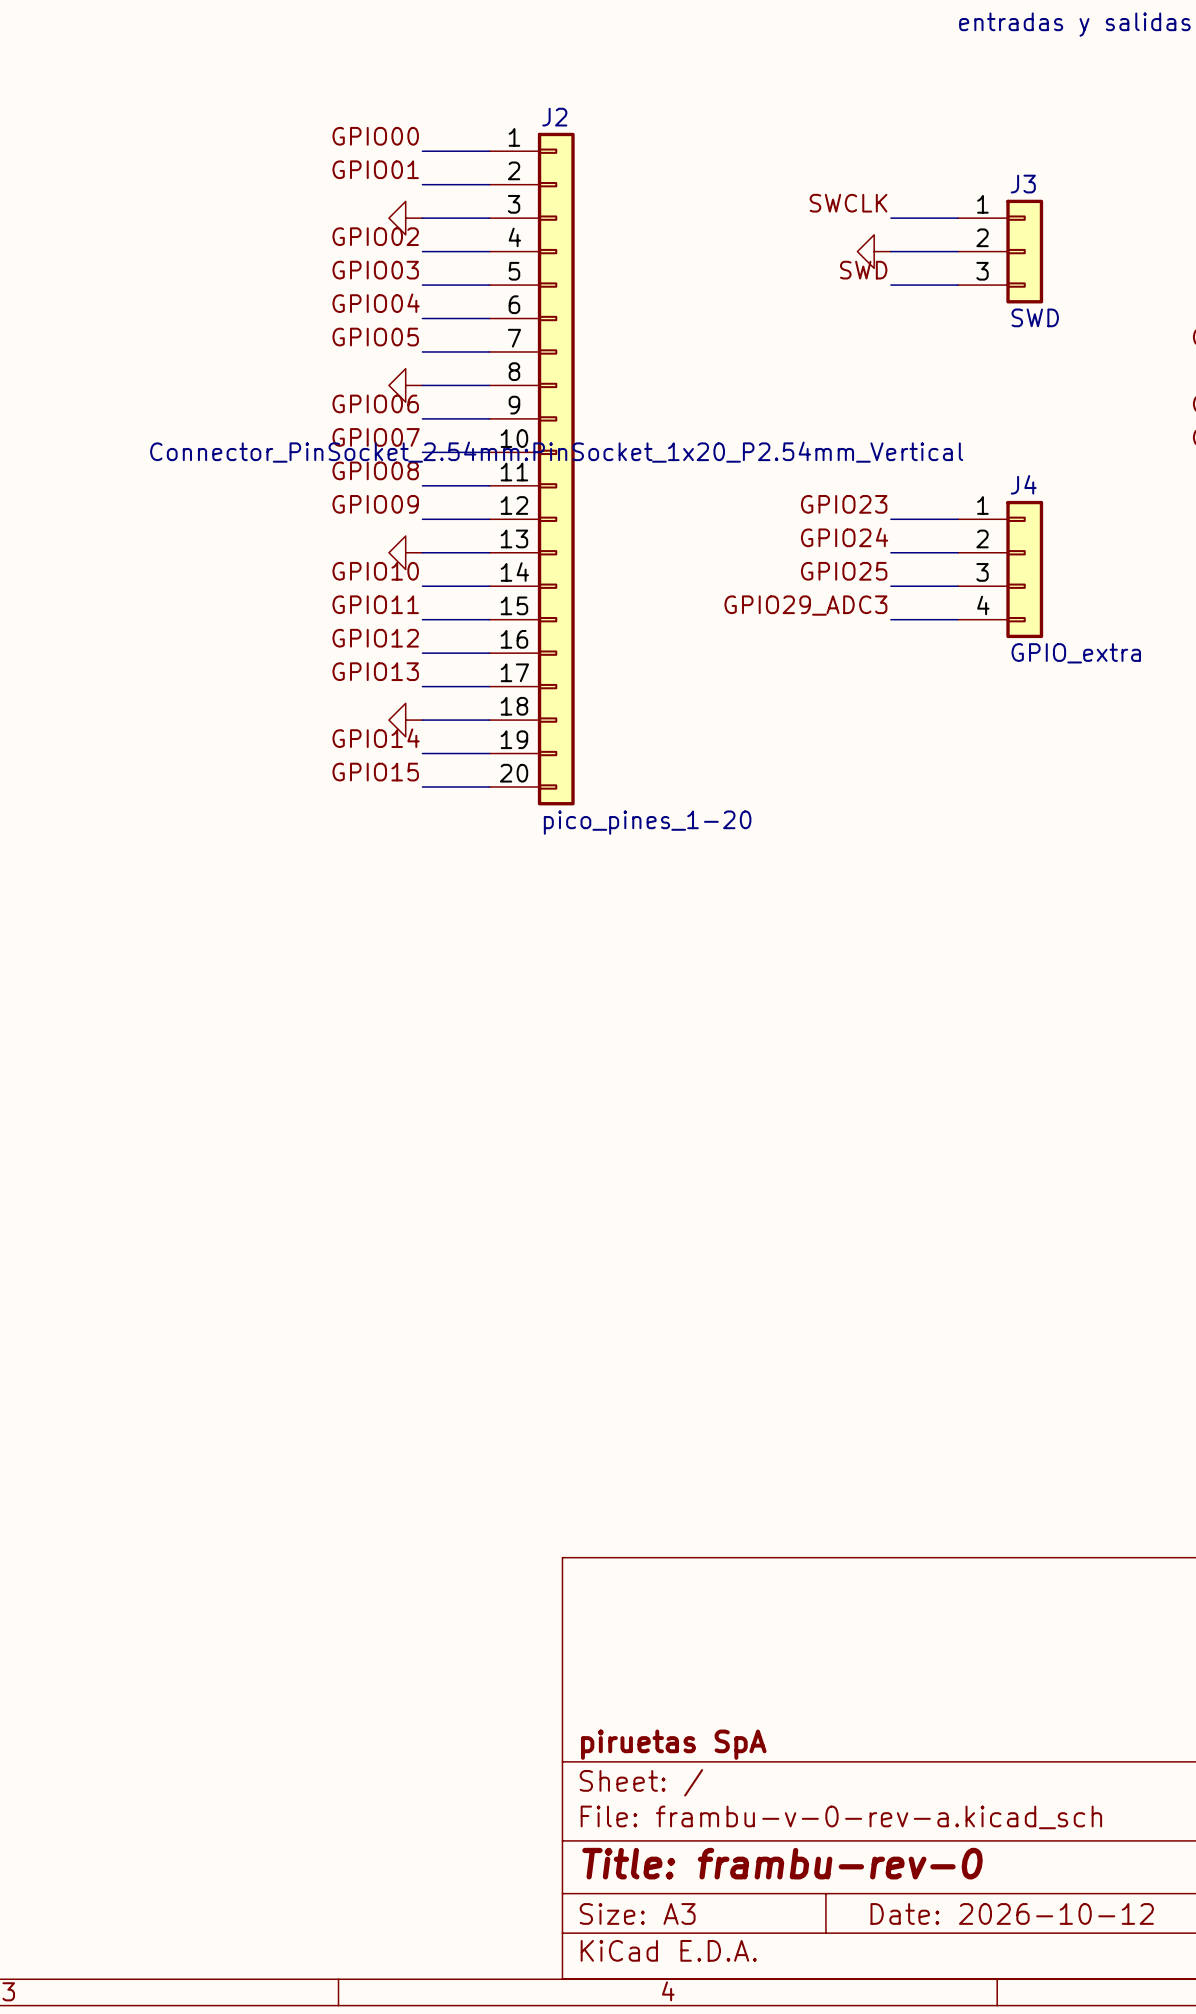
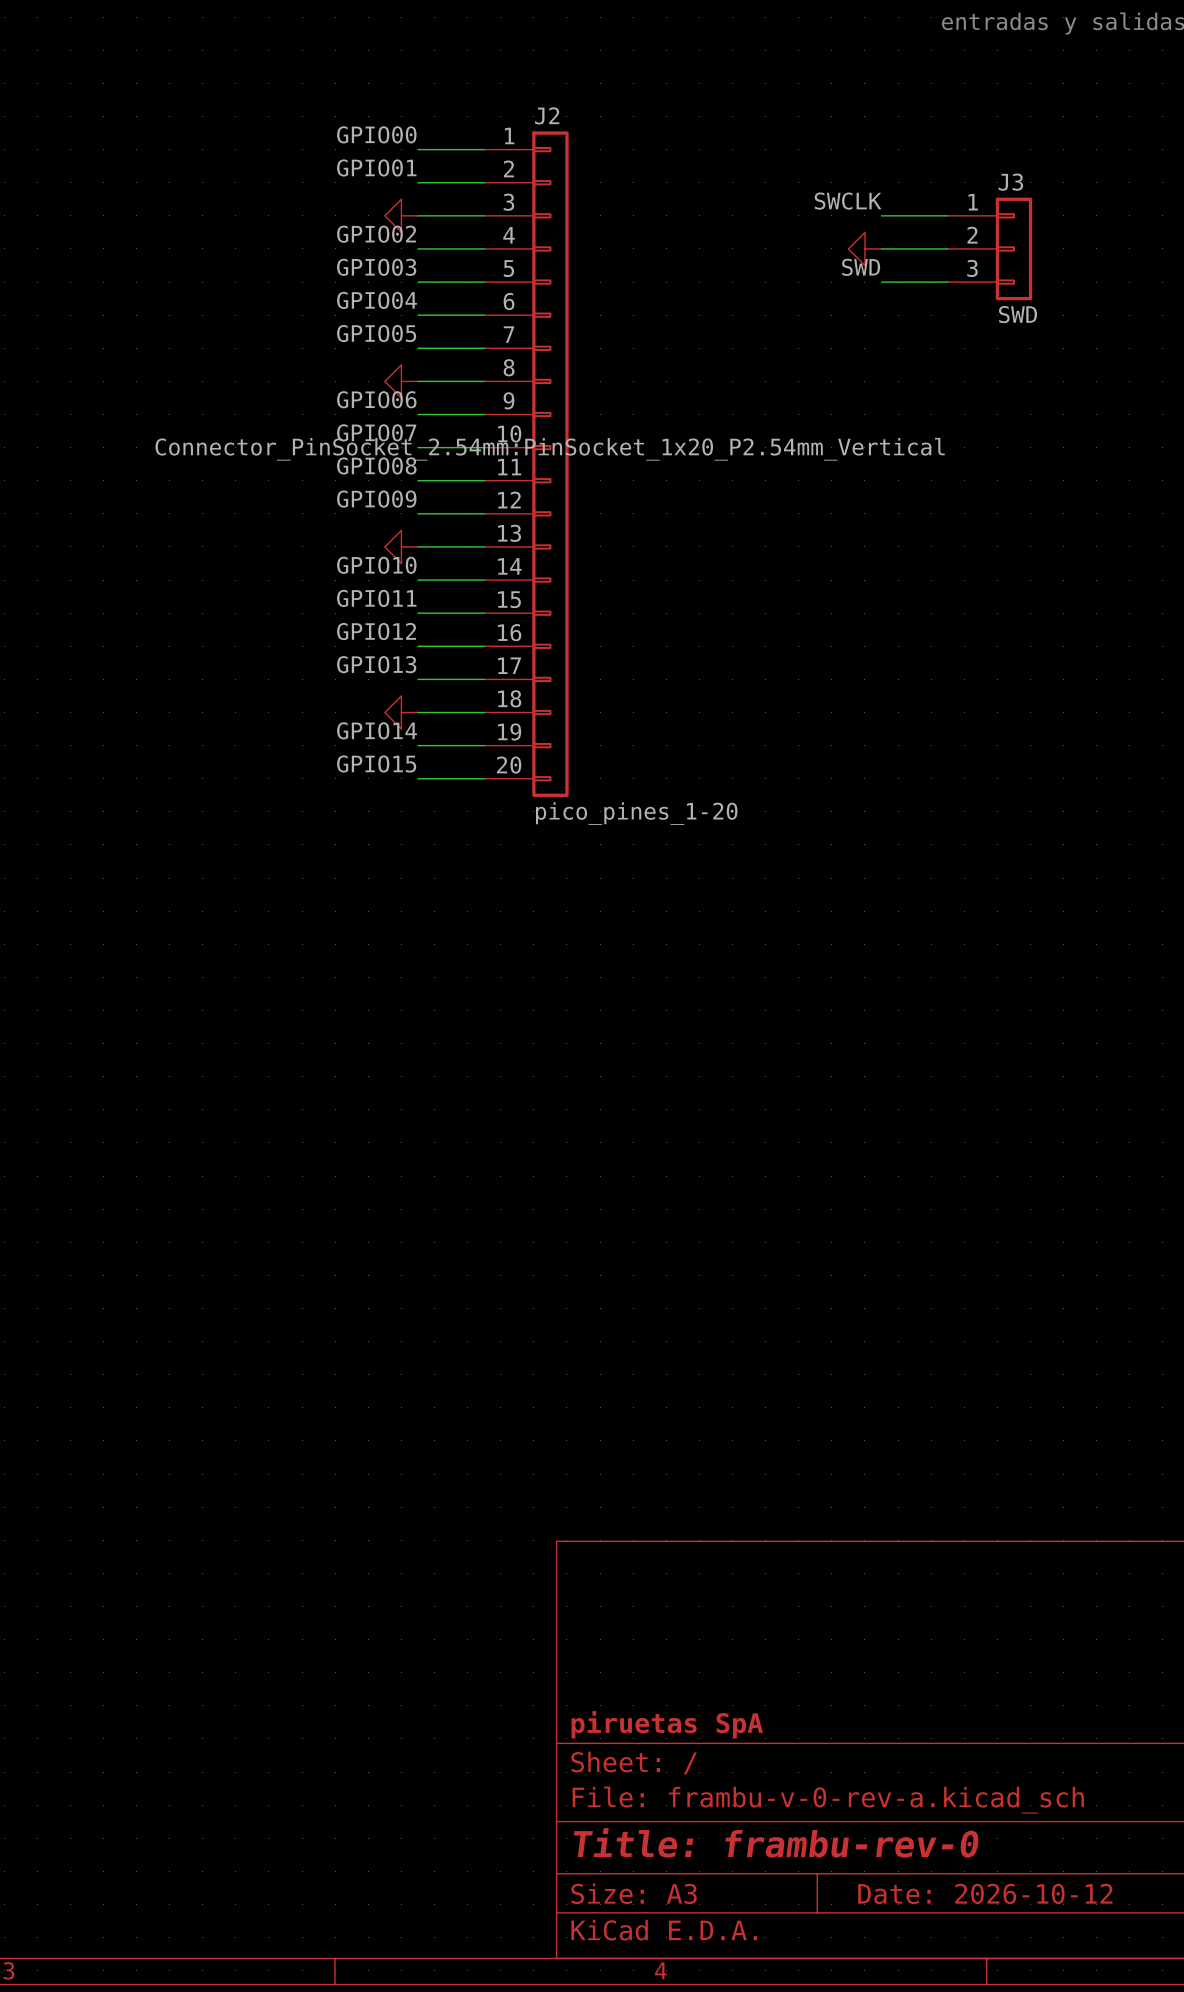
label: GPIO23 (844, 504) -> none
wire: (890, 519) (957, 519) -> none
label: GPIO24 (844, 537) -> none
wire: (890, 552) (957, 552) -> none
J4: GPIO_extra (1000, 569) -> none
label: GPIO25 (844, 571) -> none
wire: (890, 586) (957, 586) -> none
label: GPIO29_ADC3 (805, 605) -> none
wire: (890, 619) (957, 619) -> none

